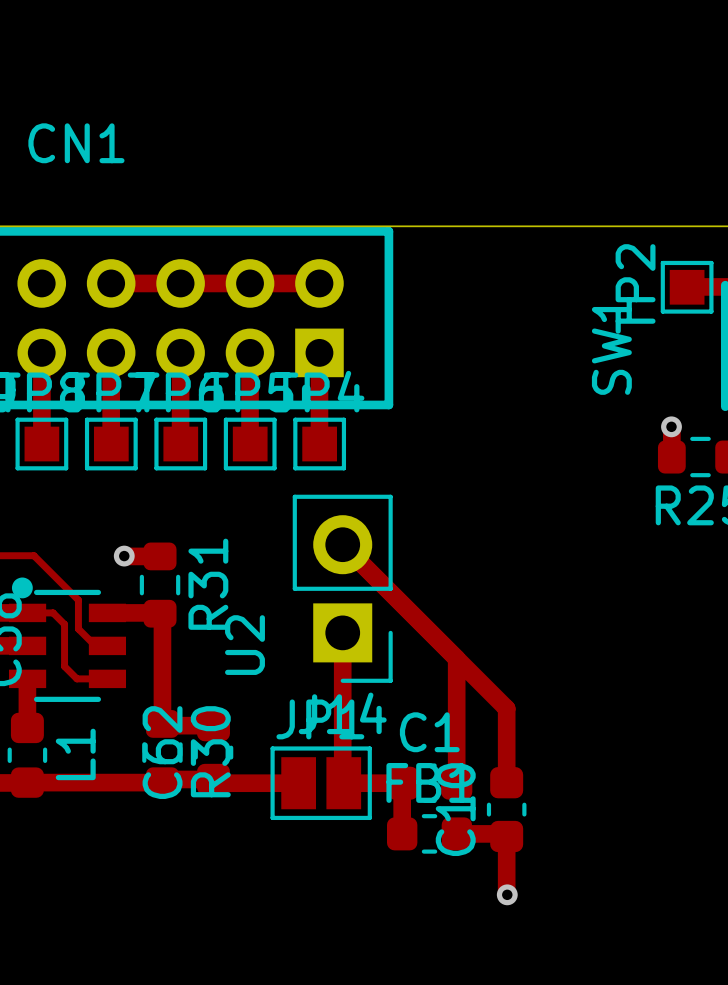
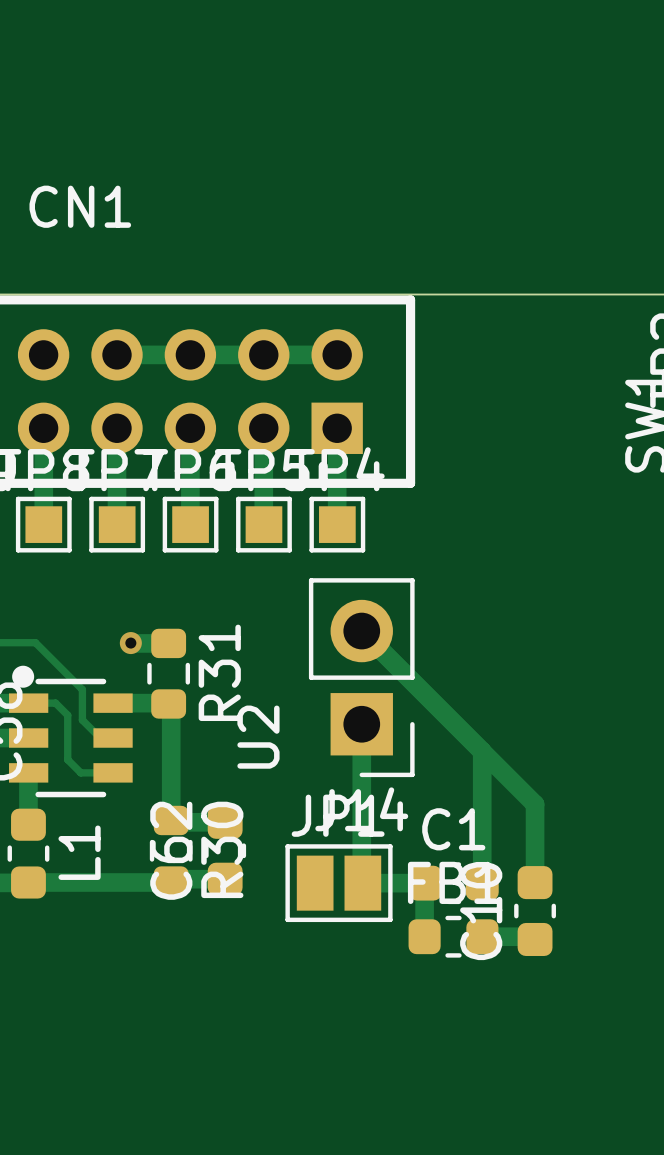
track: (213, 779) (217, 783) (298, 783) -> none
track: (506, 836) (507, 894) -> none
via: (507, 894) -> none

